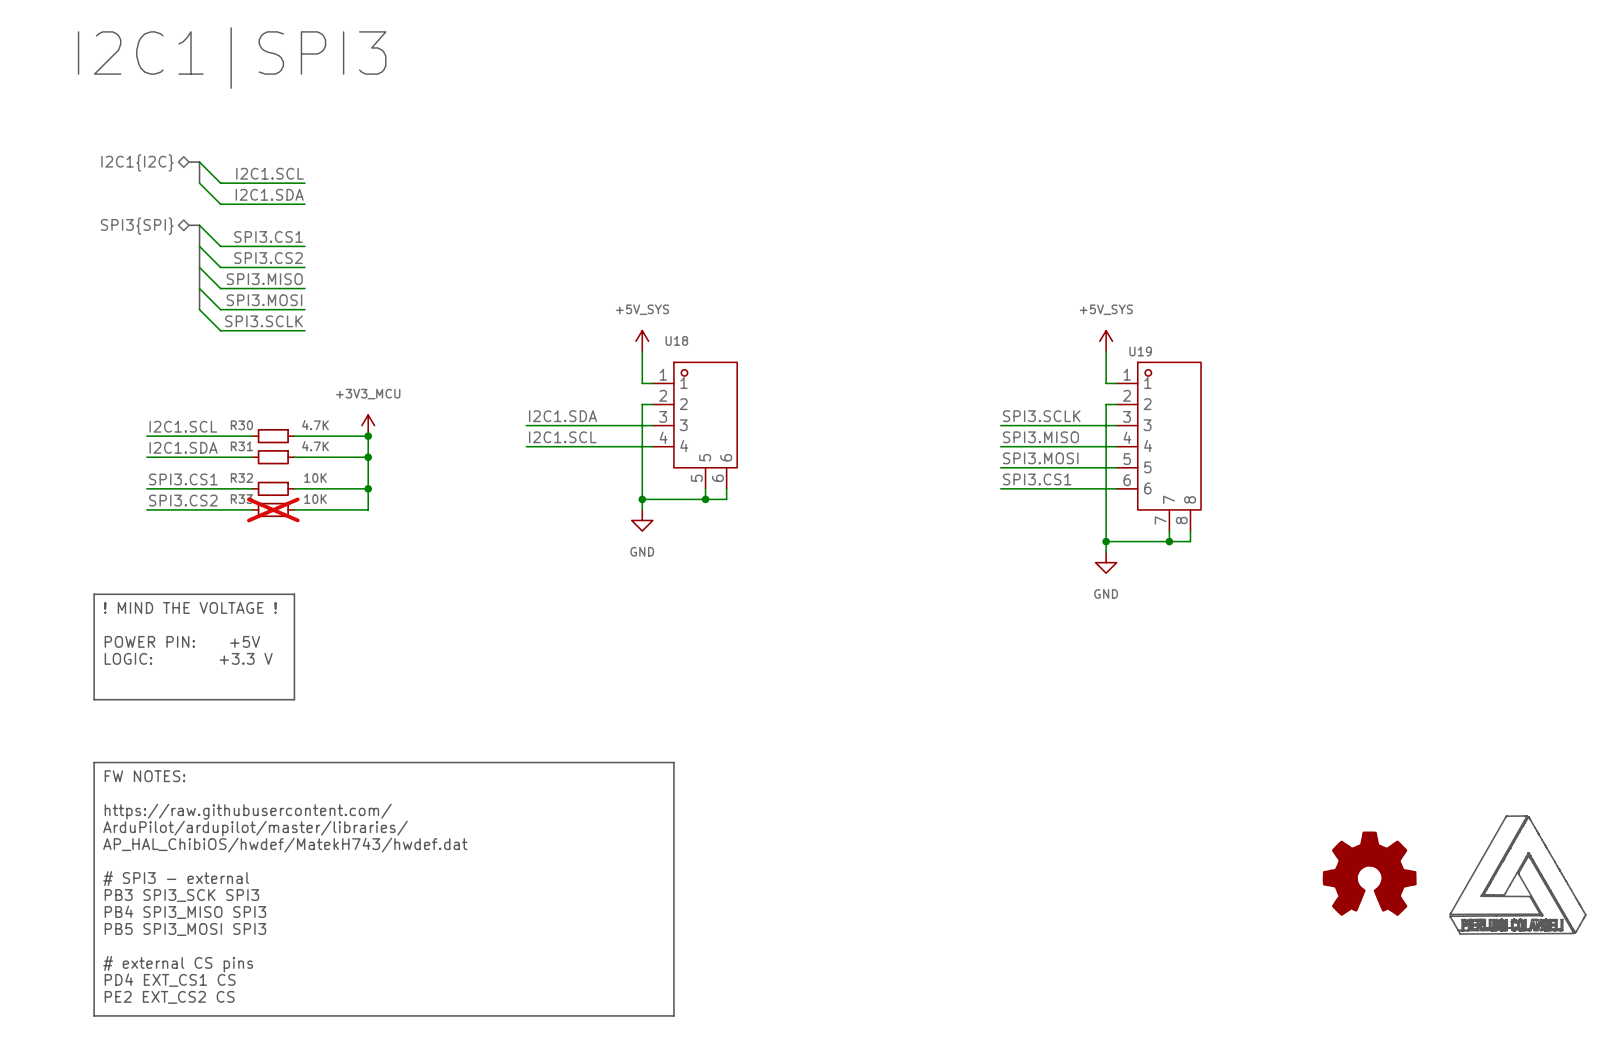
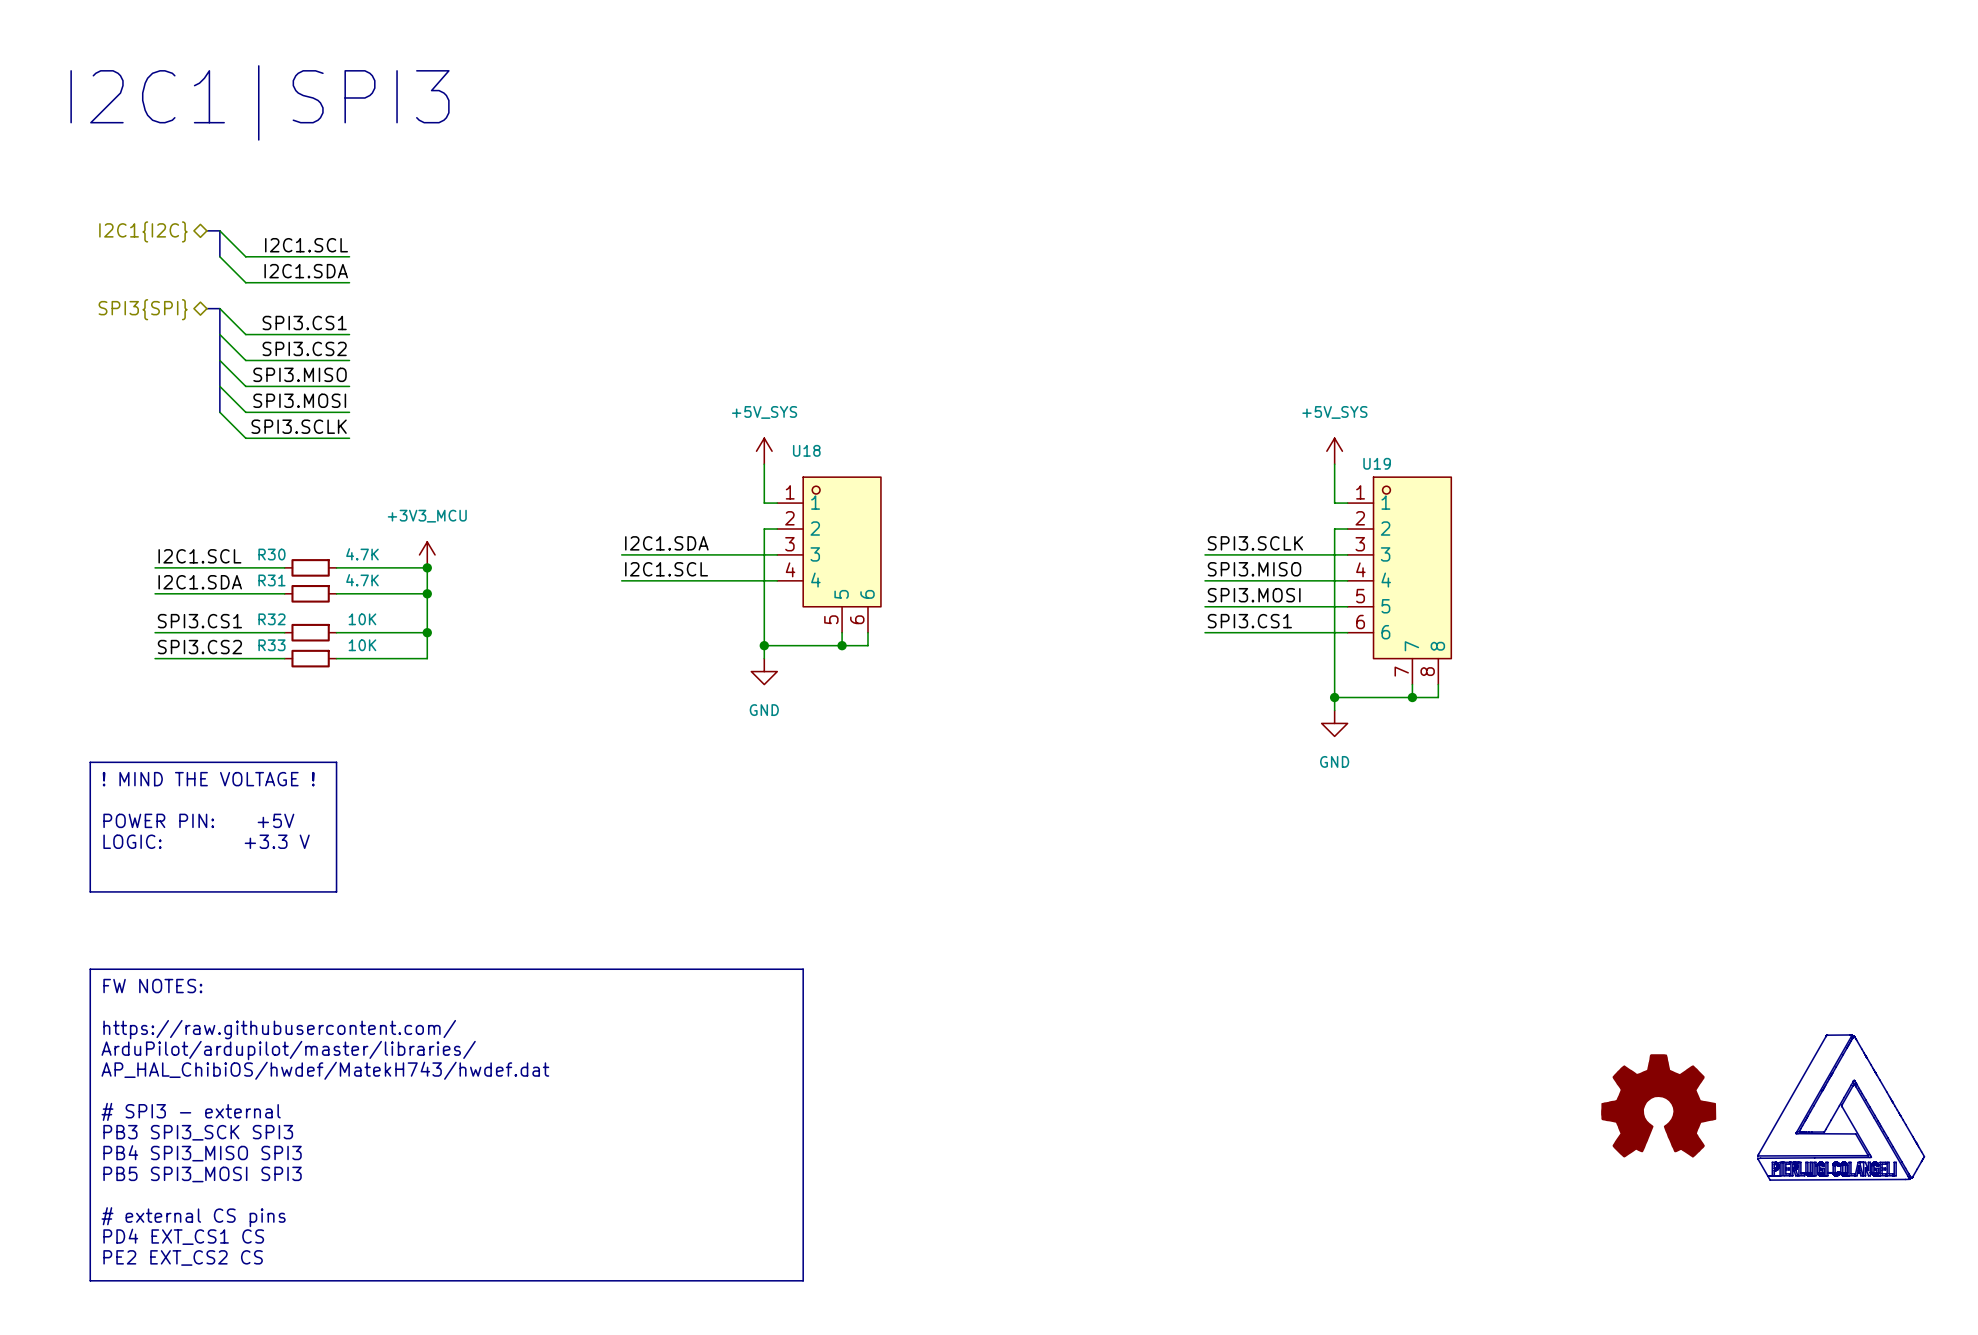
R33 do-not-place cross: (273, 509) -> none

